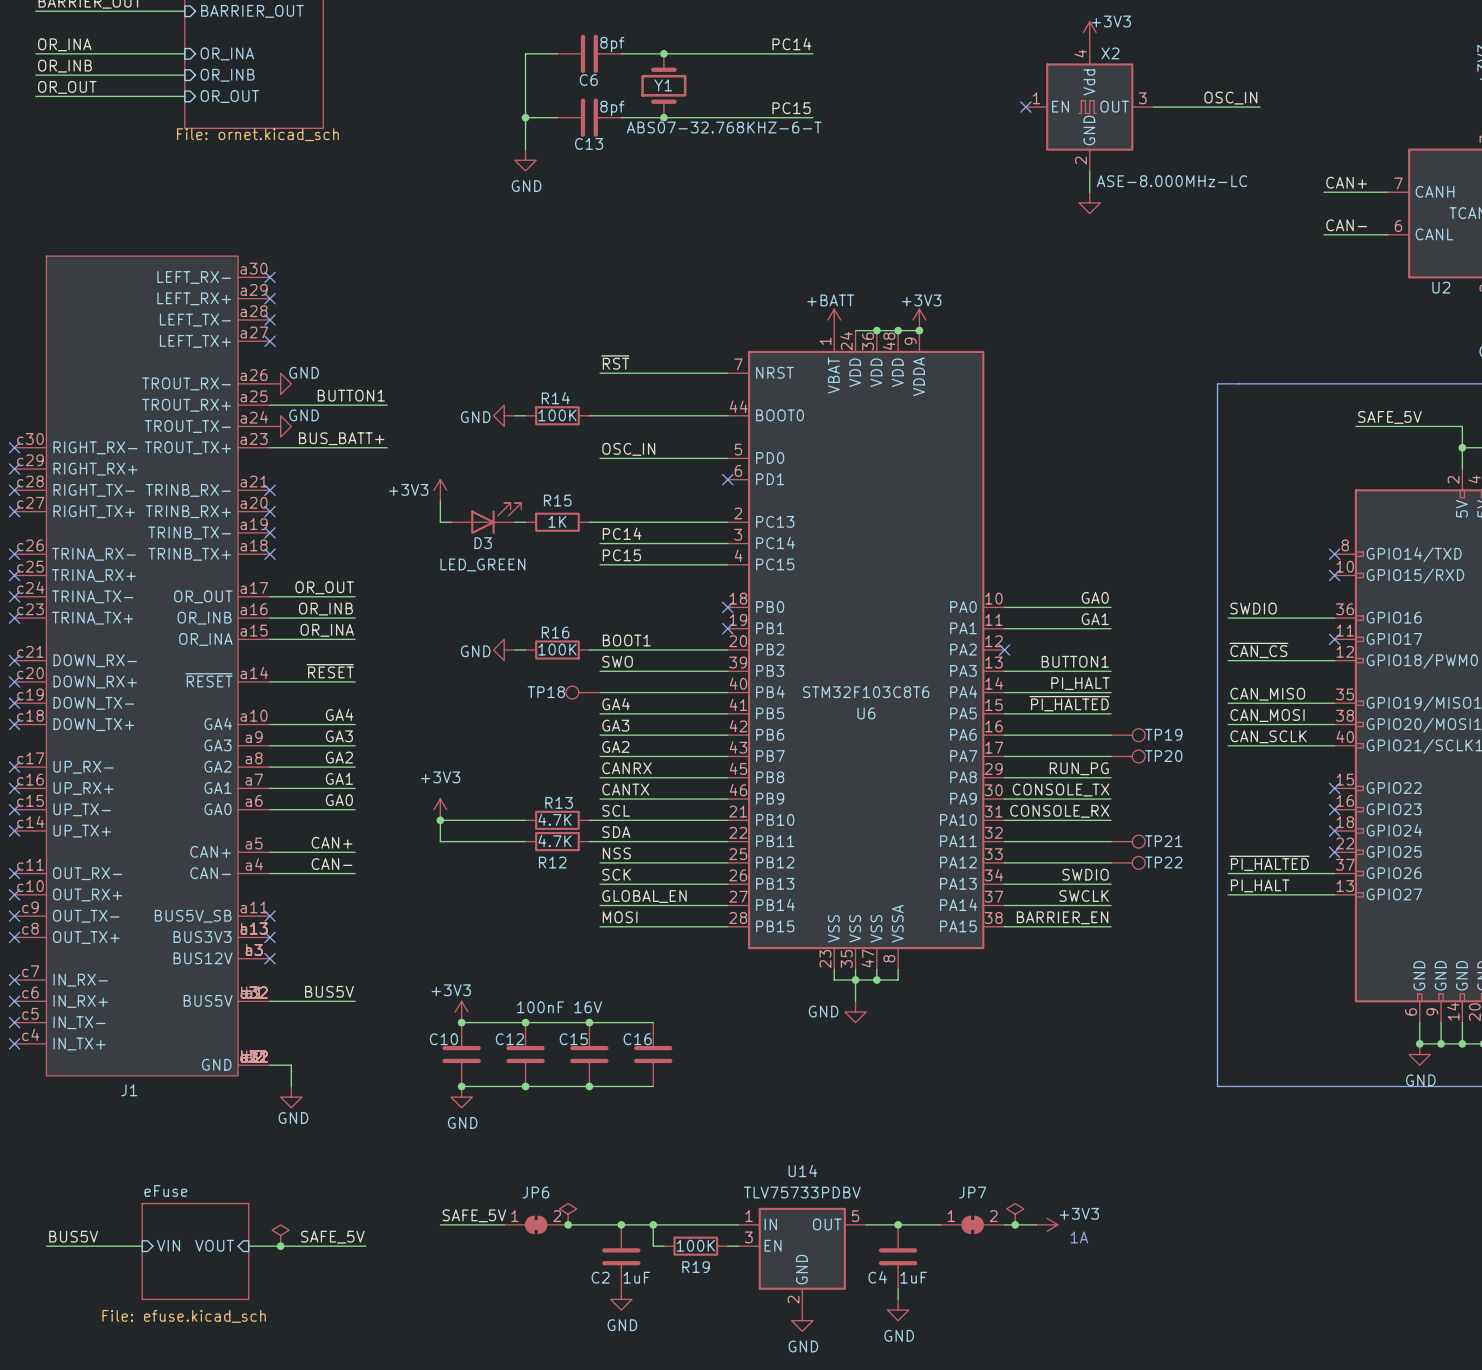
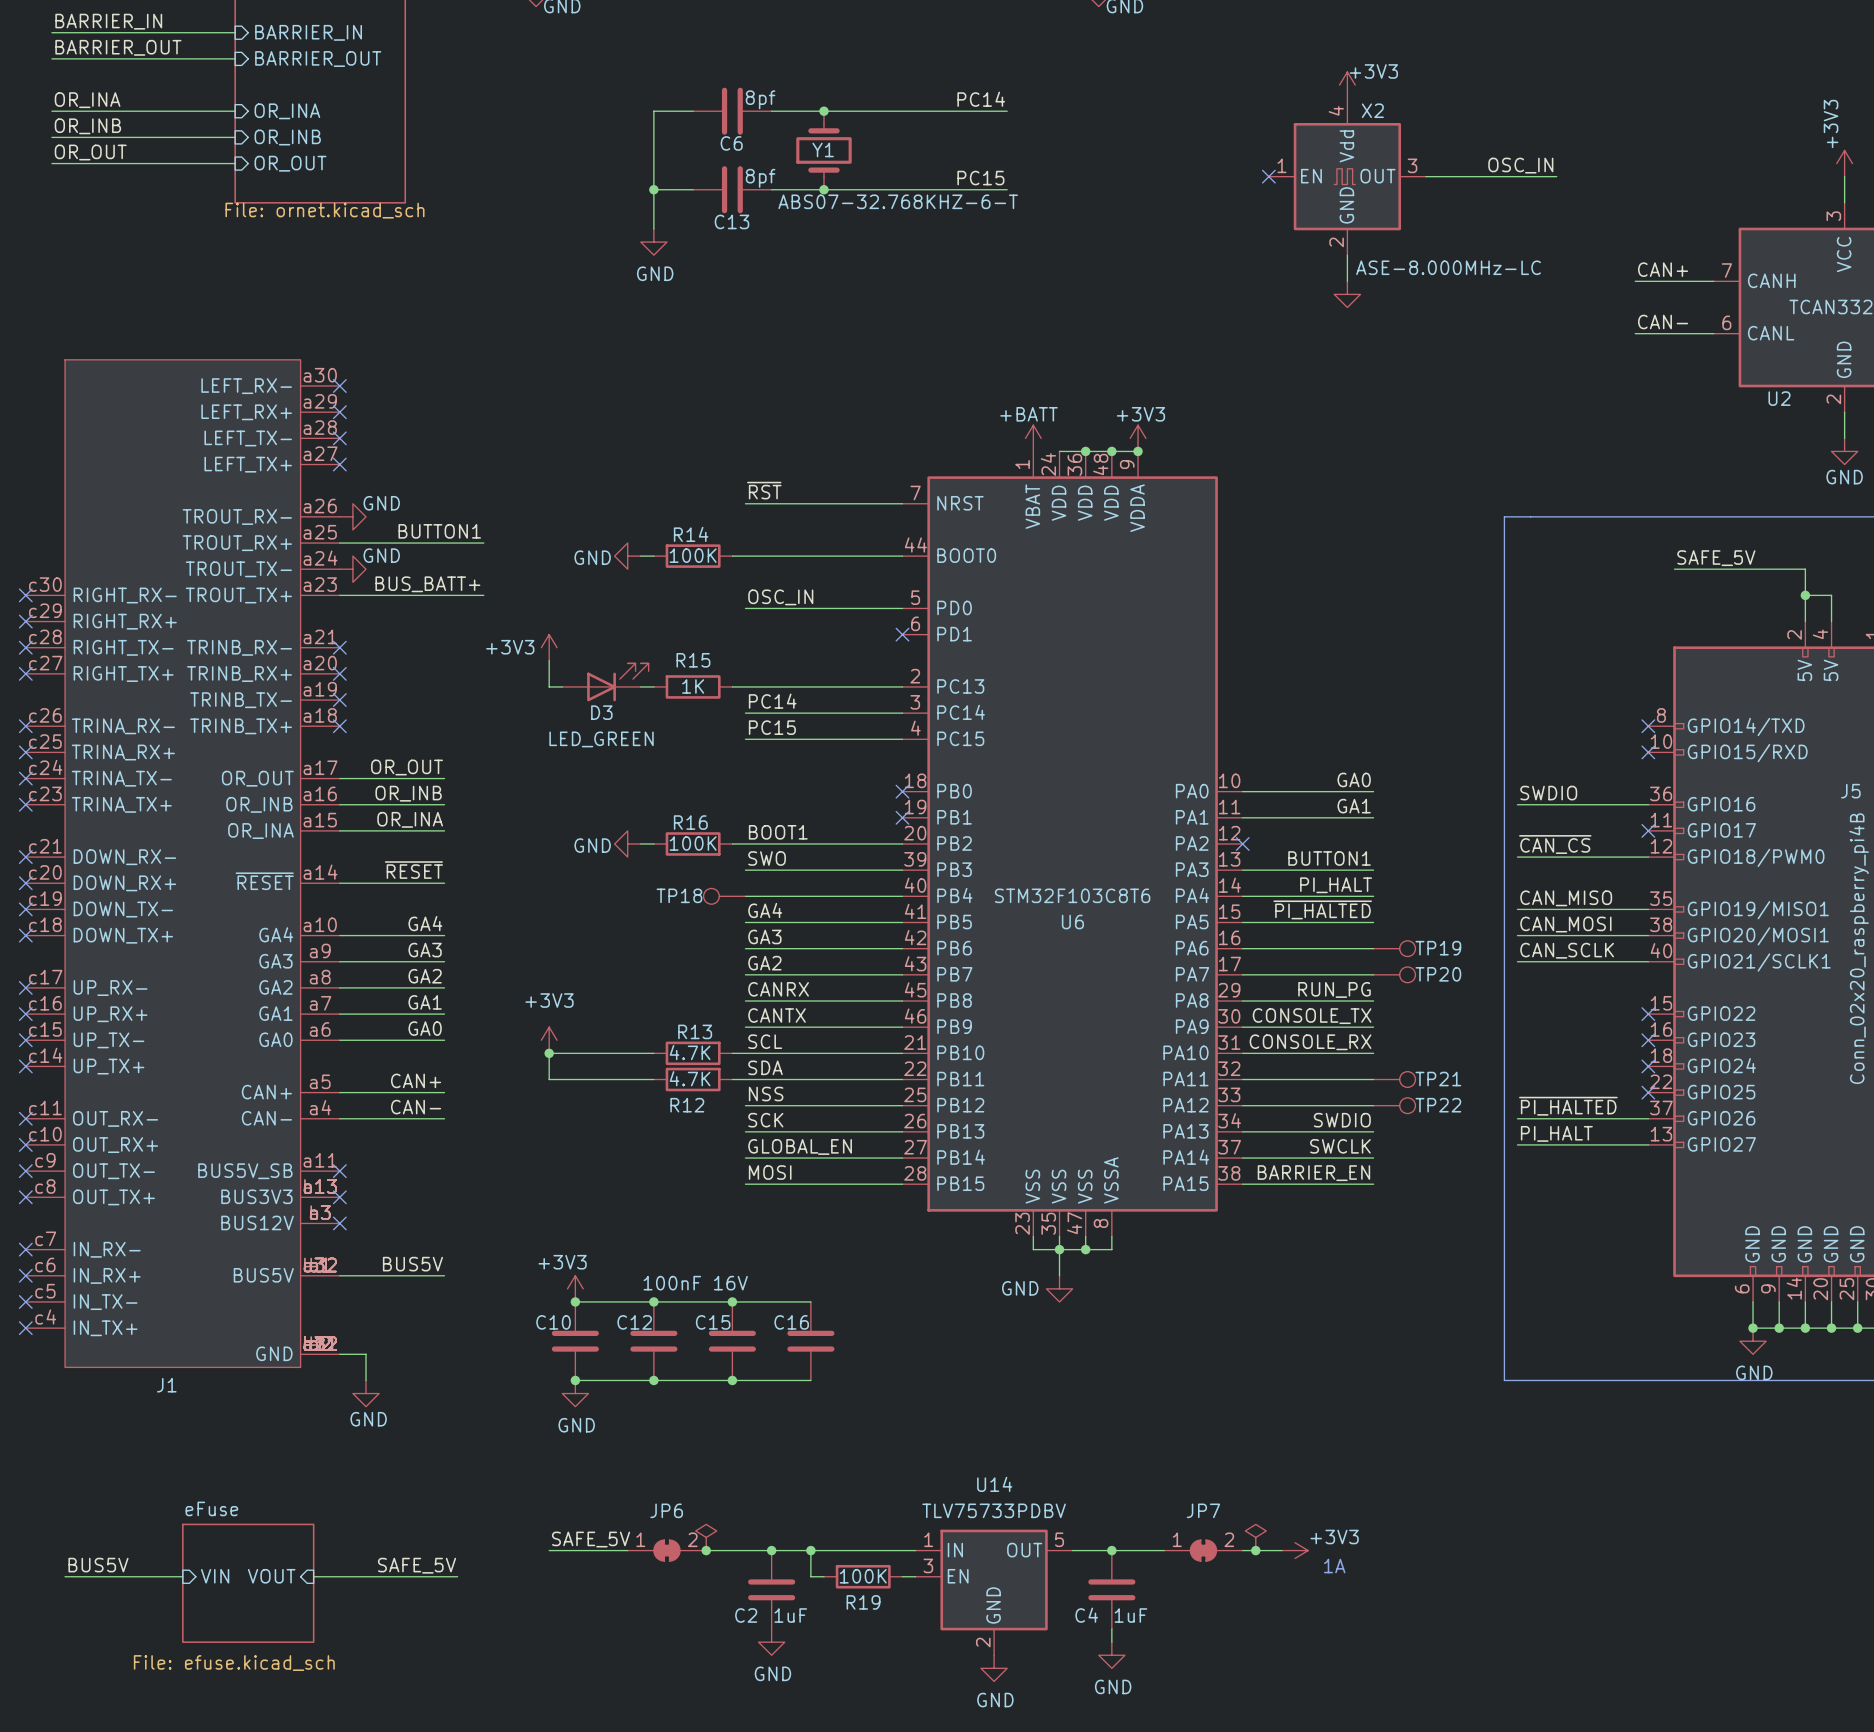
power symbol: (280, 1235) -> none
junction: (280, 1246) -> none

